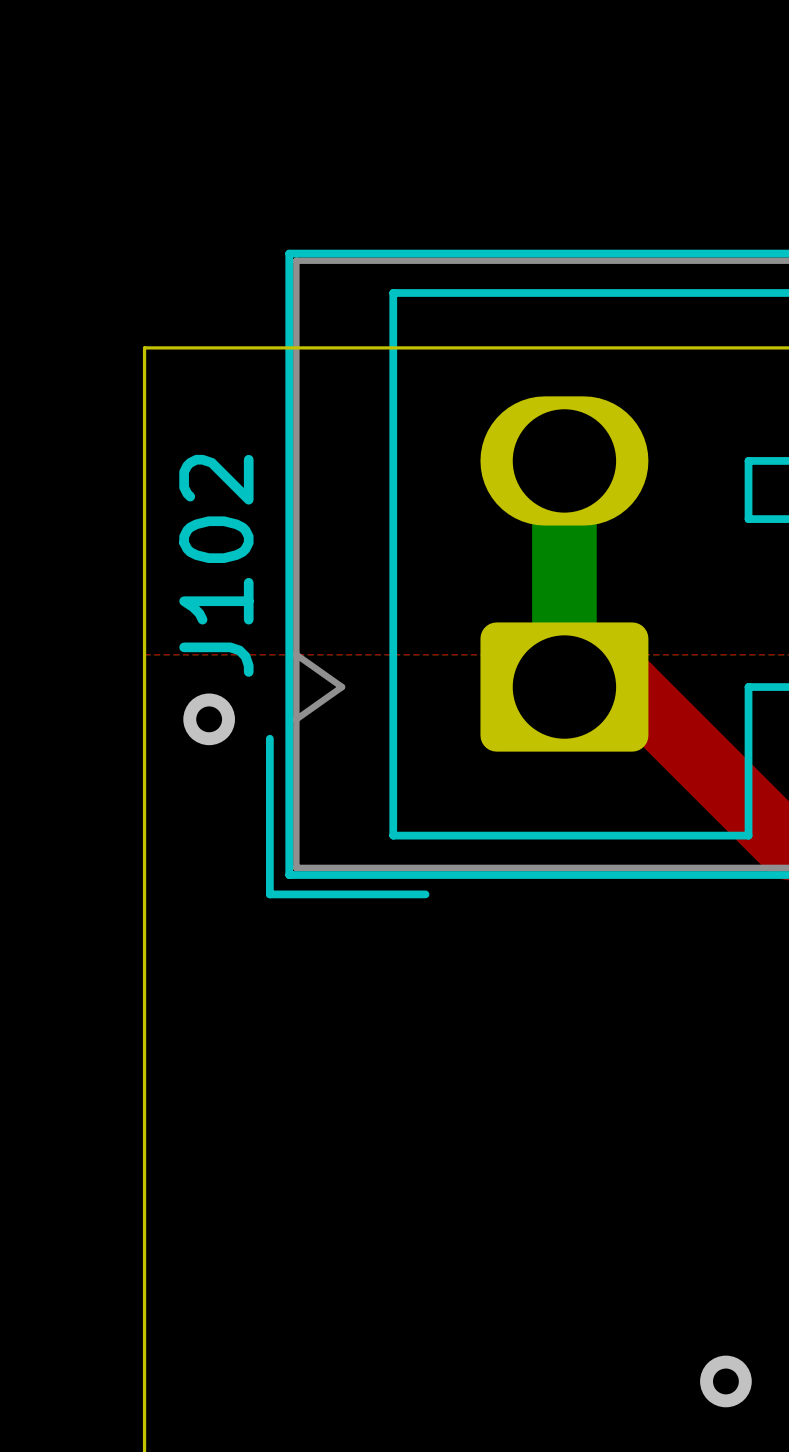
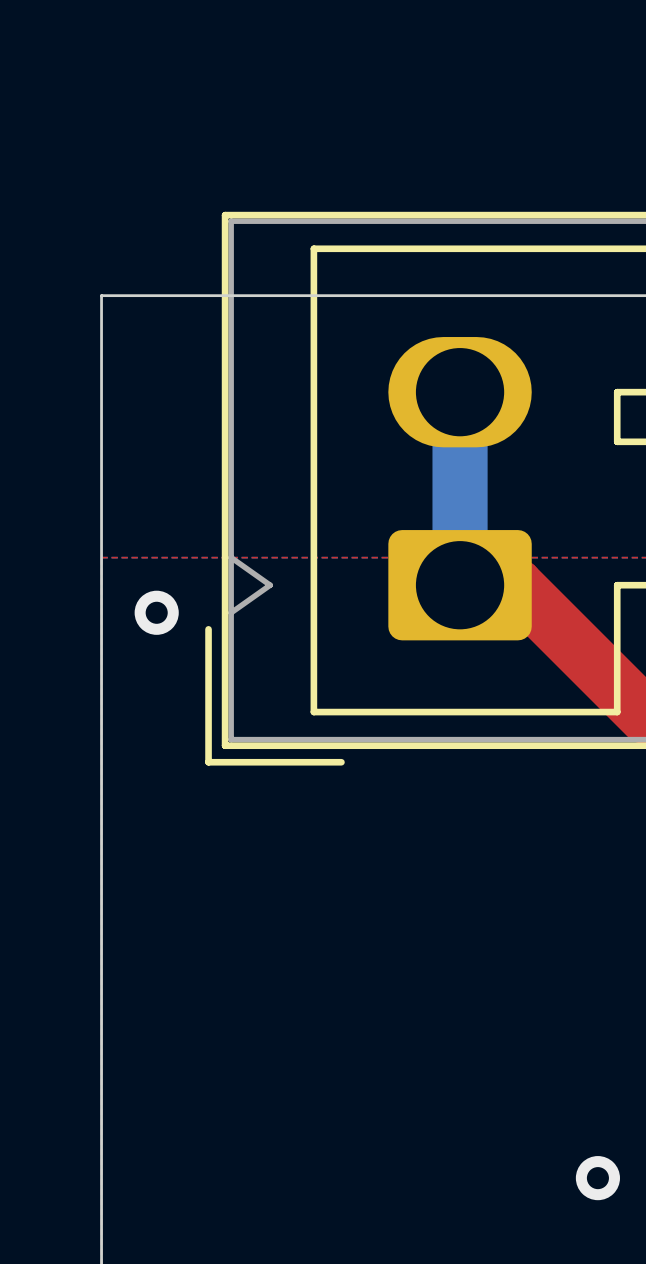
J102 name: J102 (216, 565) -> none

